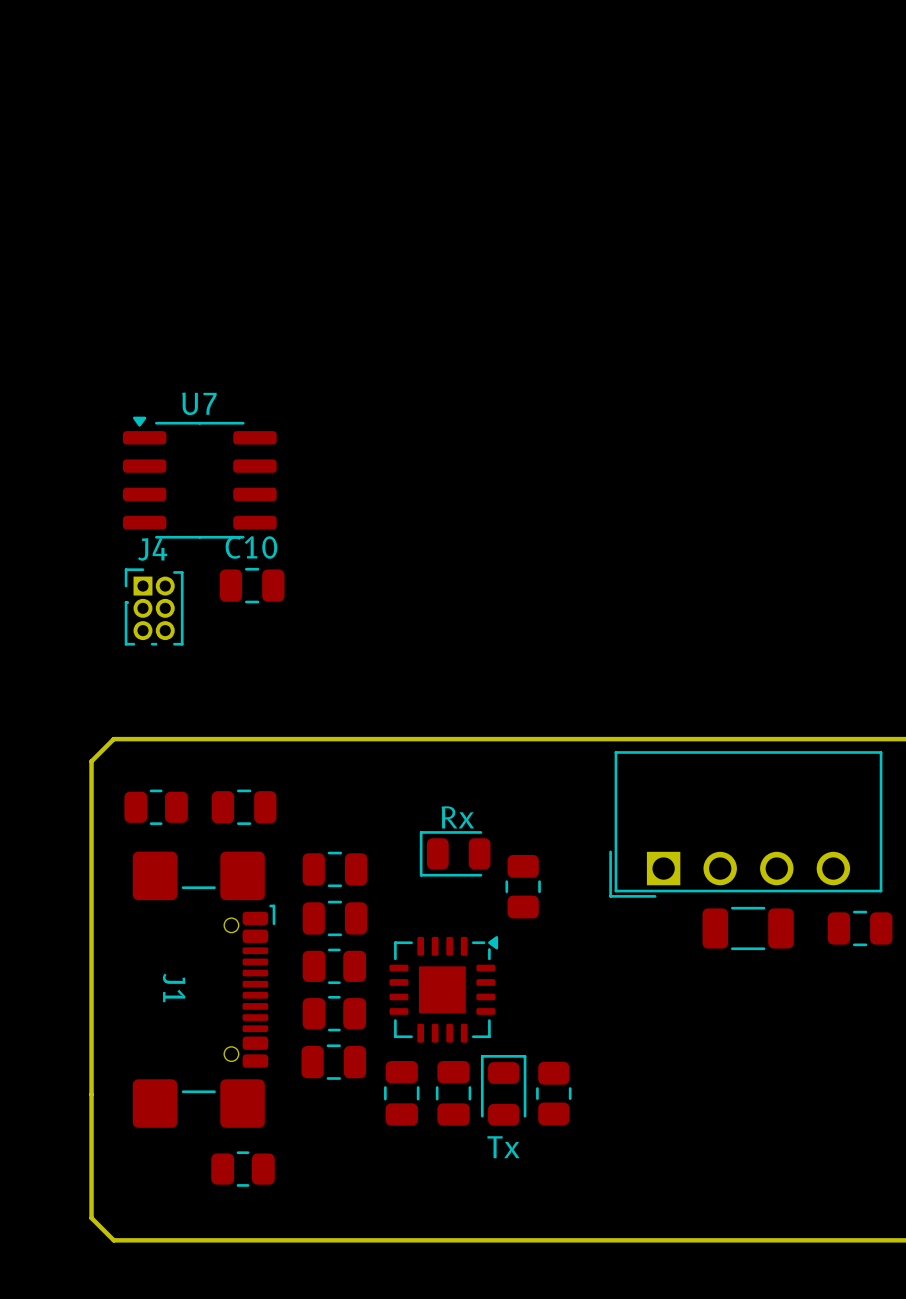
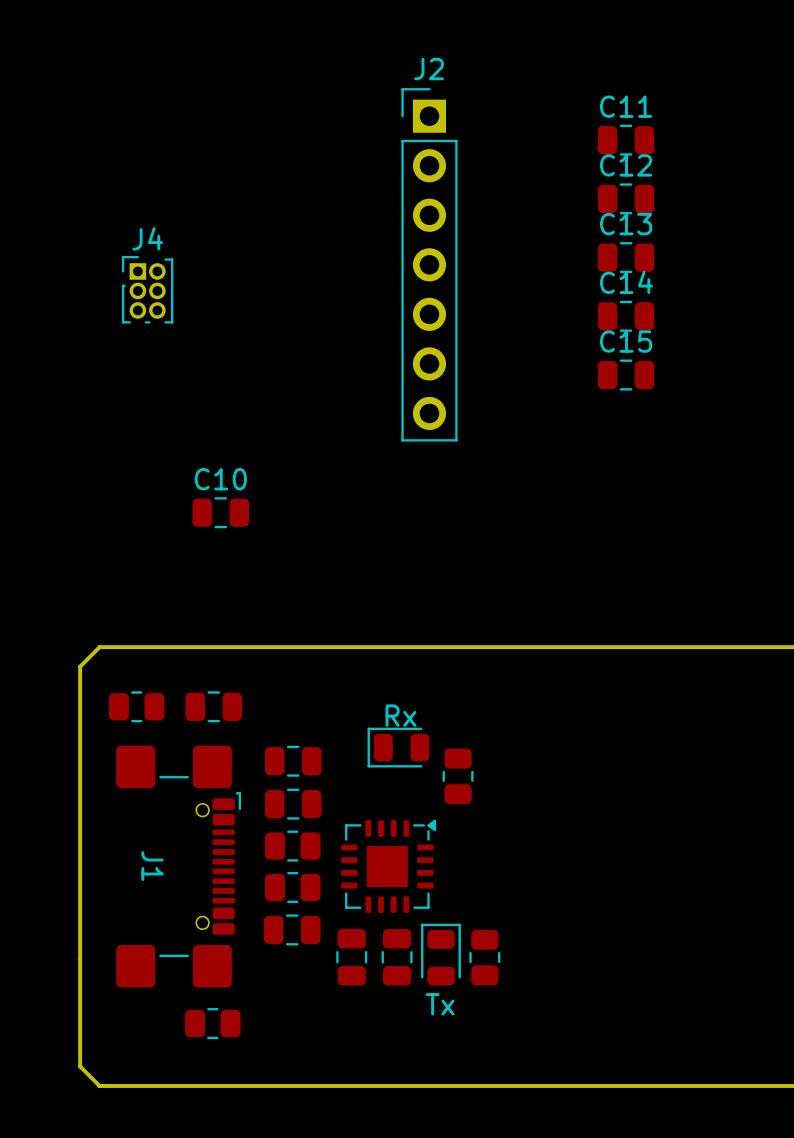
C11: none -> (626, 140)
C12: none -> (626, 198)
C13: none -> (626, 257)
J2: none -> (429, 264)
C14: none -> (626, 316)
C15: none -> (626, 375)
U7: (199, 477) -> none
J4 position: (154, 606) -> (147, 289)
part: (745, 824) -> none
part: (748, 928) -> none
part: (860, 928) -> none

